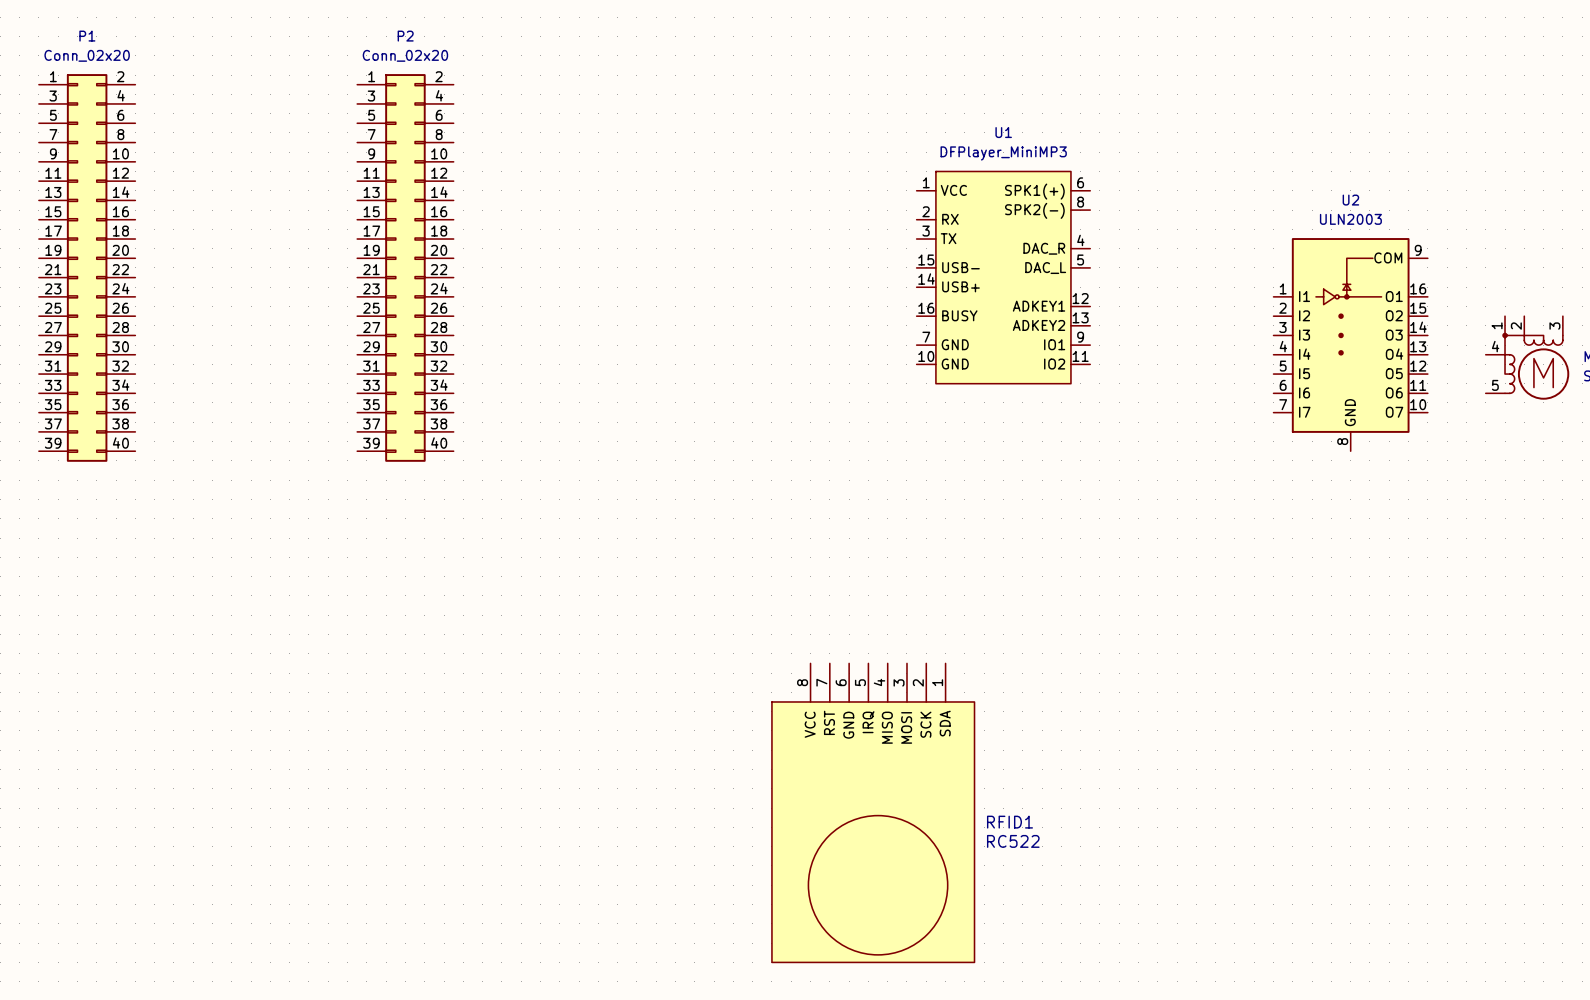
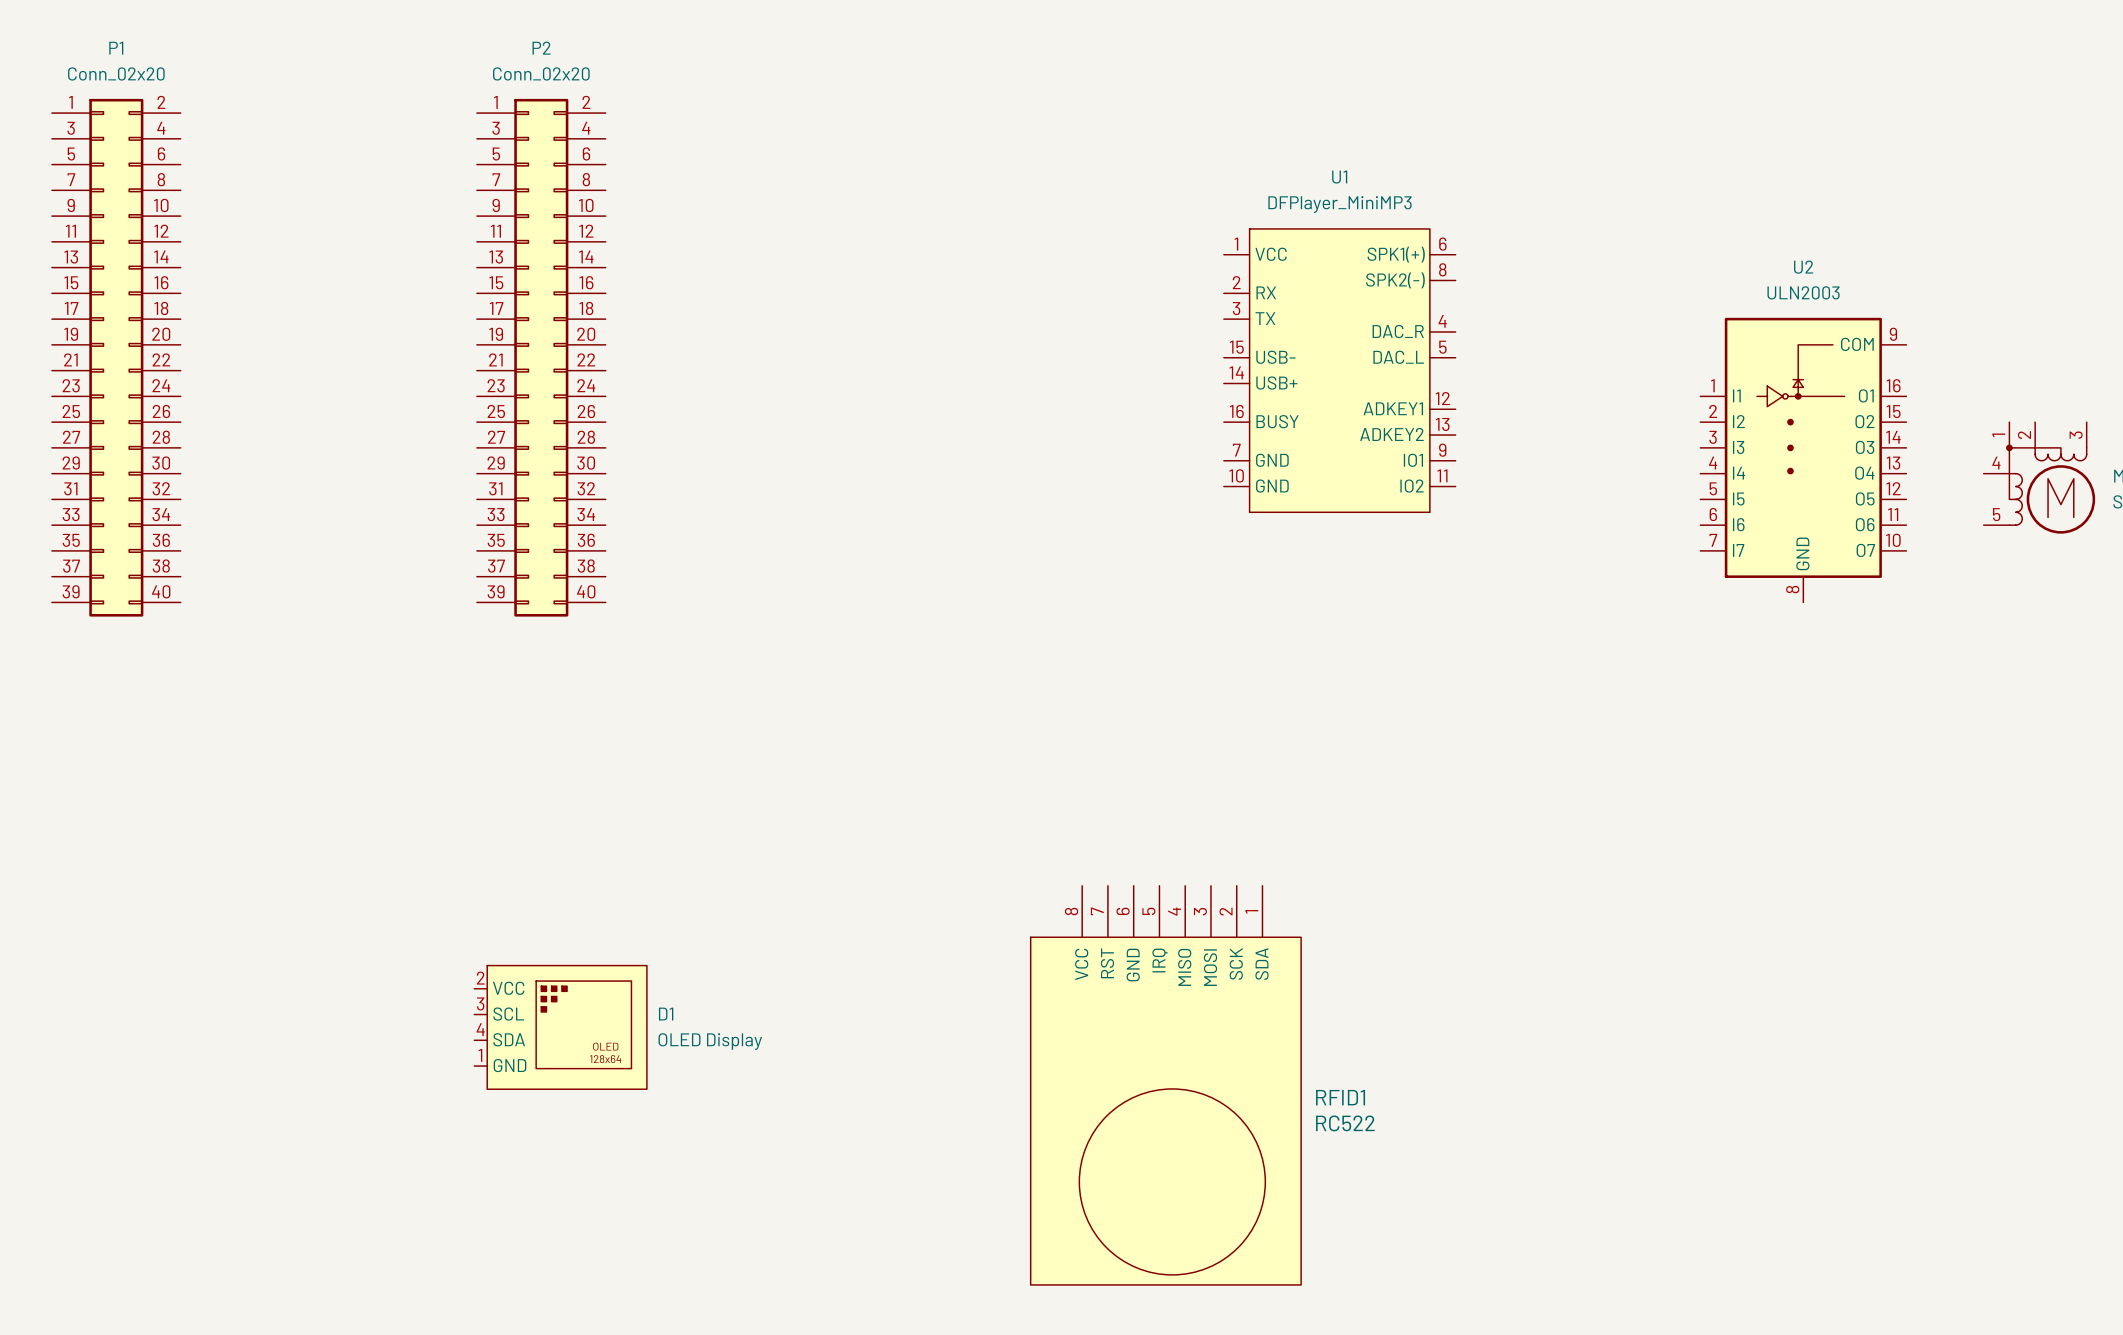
D1: none -> OLED Display (560, 1027)

